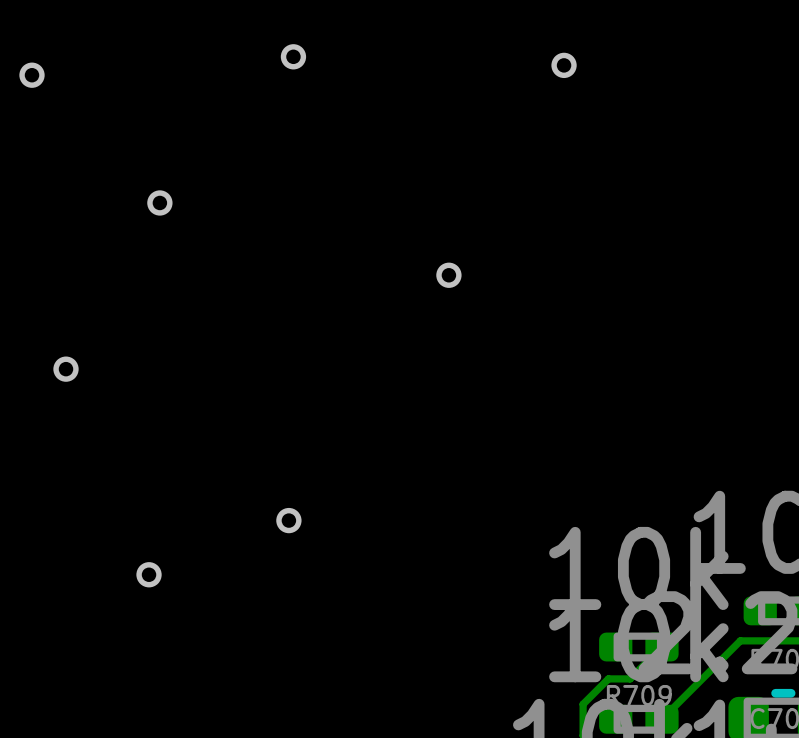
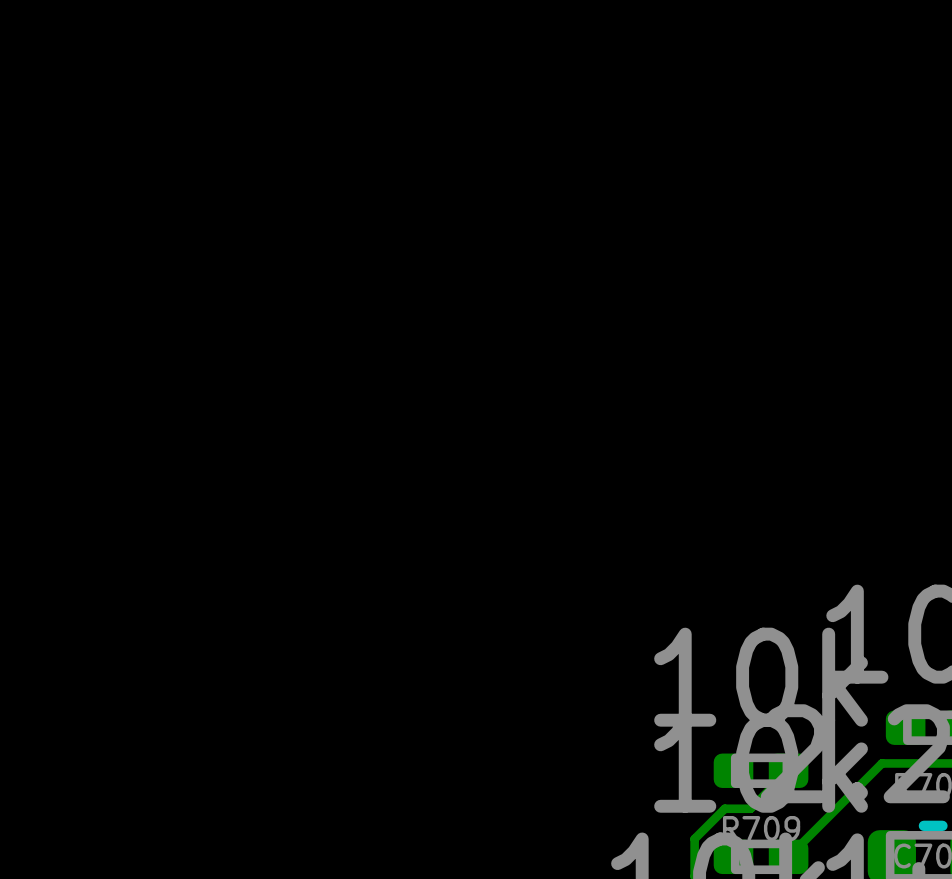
via: (293, 56) -> none
via: (564, 65) -> none
via: (32, 75) -> none
via: (159, 202) -> none
via: (448, 275) -> none
via: (66, 369) -> none
via: (288, 520) -> none
via: (149, 574) -> none

